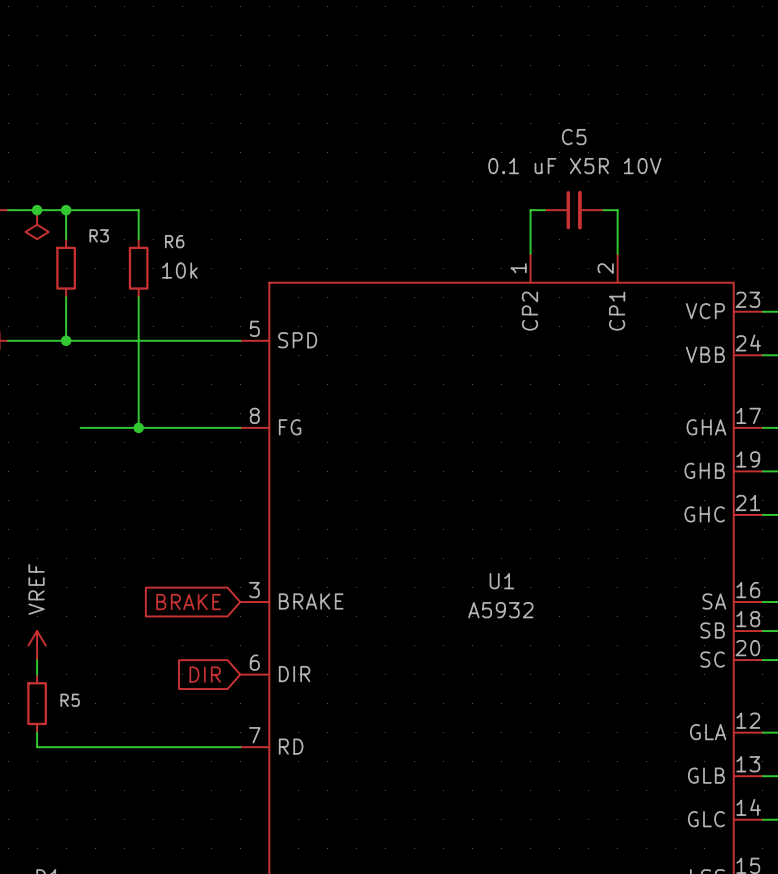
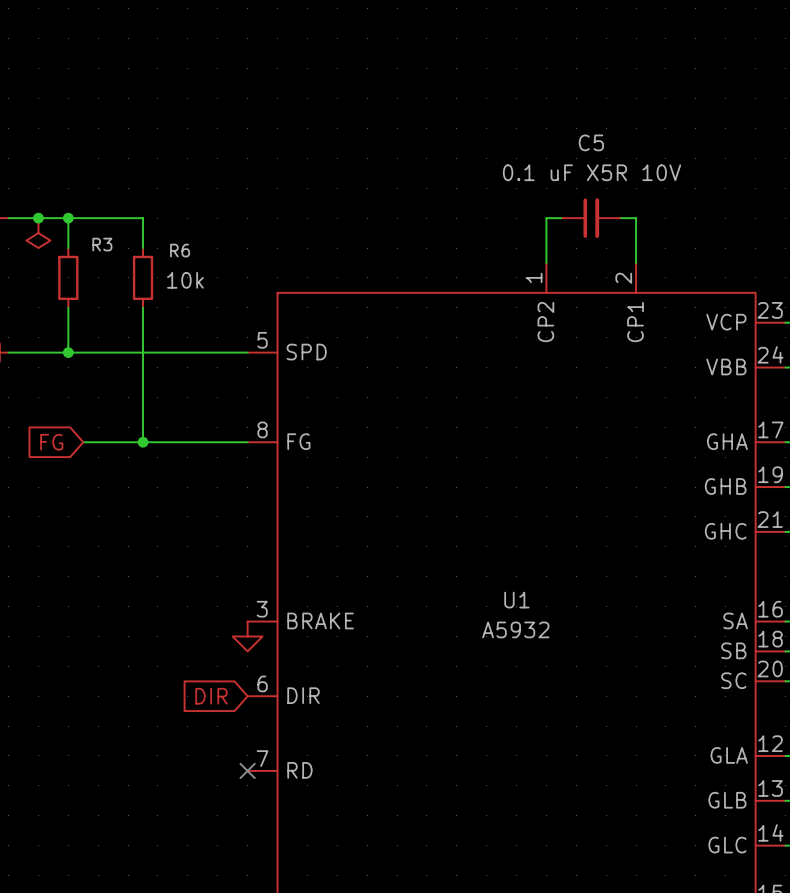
global label: none -> FG (51, 442)
global label: BRAKE (188, 602) -> none
power symbol: none -> (247, 636)
power symbol: VREF (37, 645) -> none
wire: (37, 660) (37, 674) -> none
R5: (37, 703) -> none
wire: (37, 732) (37, 747) (240, 747) -> none
no-connect mark: none -> (247, 770)

